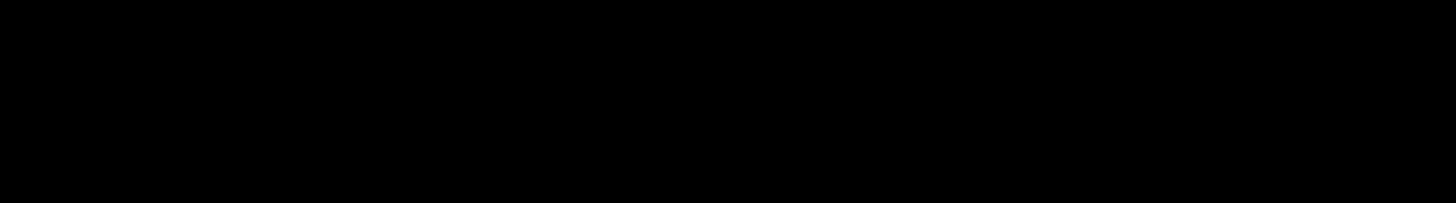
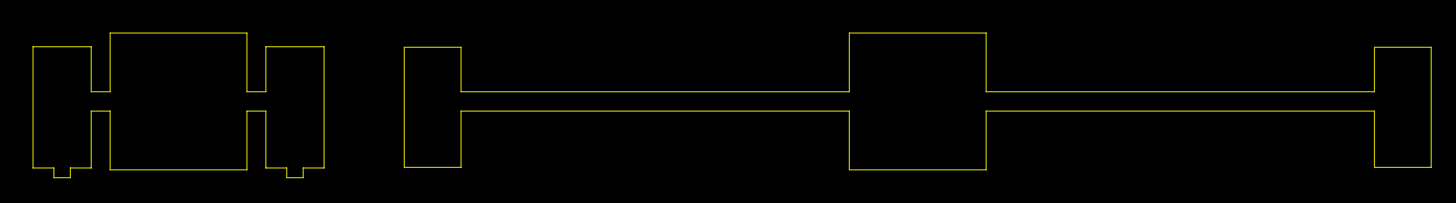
drawing: none -> [32, 32, 325, 179]
drawing: none -> [403, 32, 1432, 171]

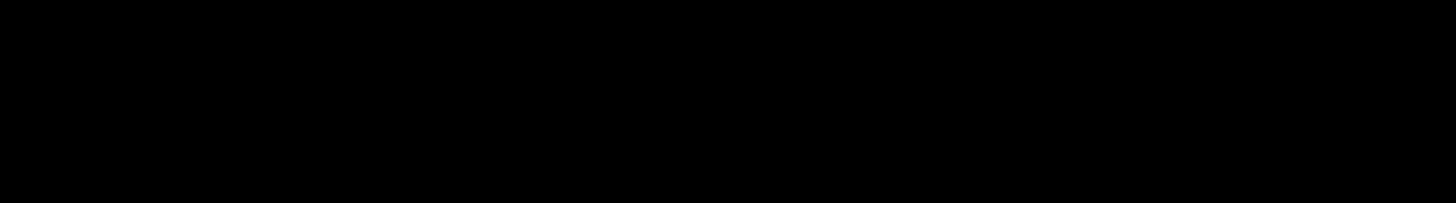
drawing: [32, 32, 325, 179] -> none
drawing: [403, 32, 1432, 171] -> none

